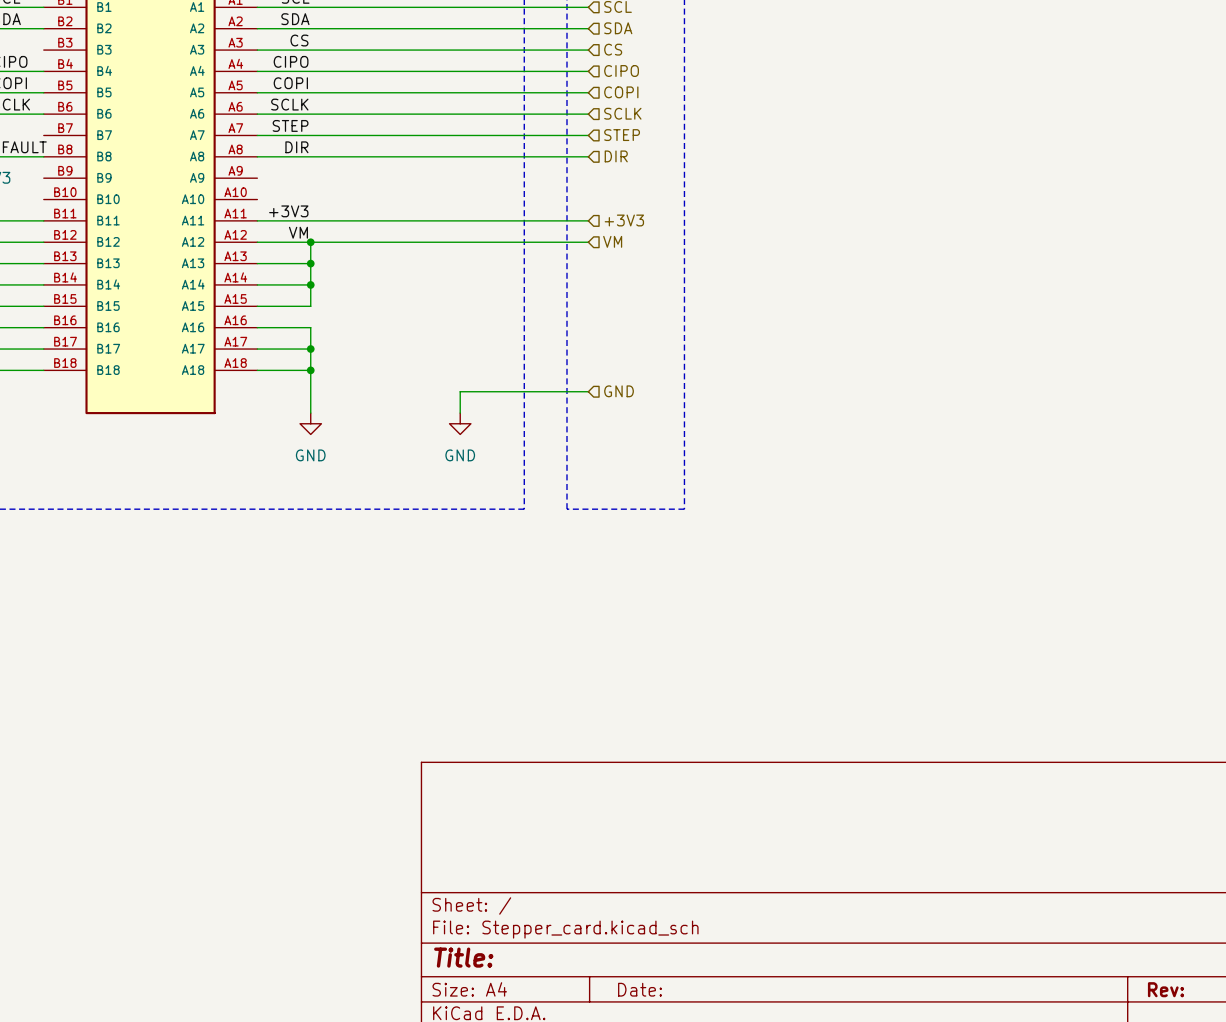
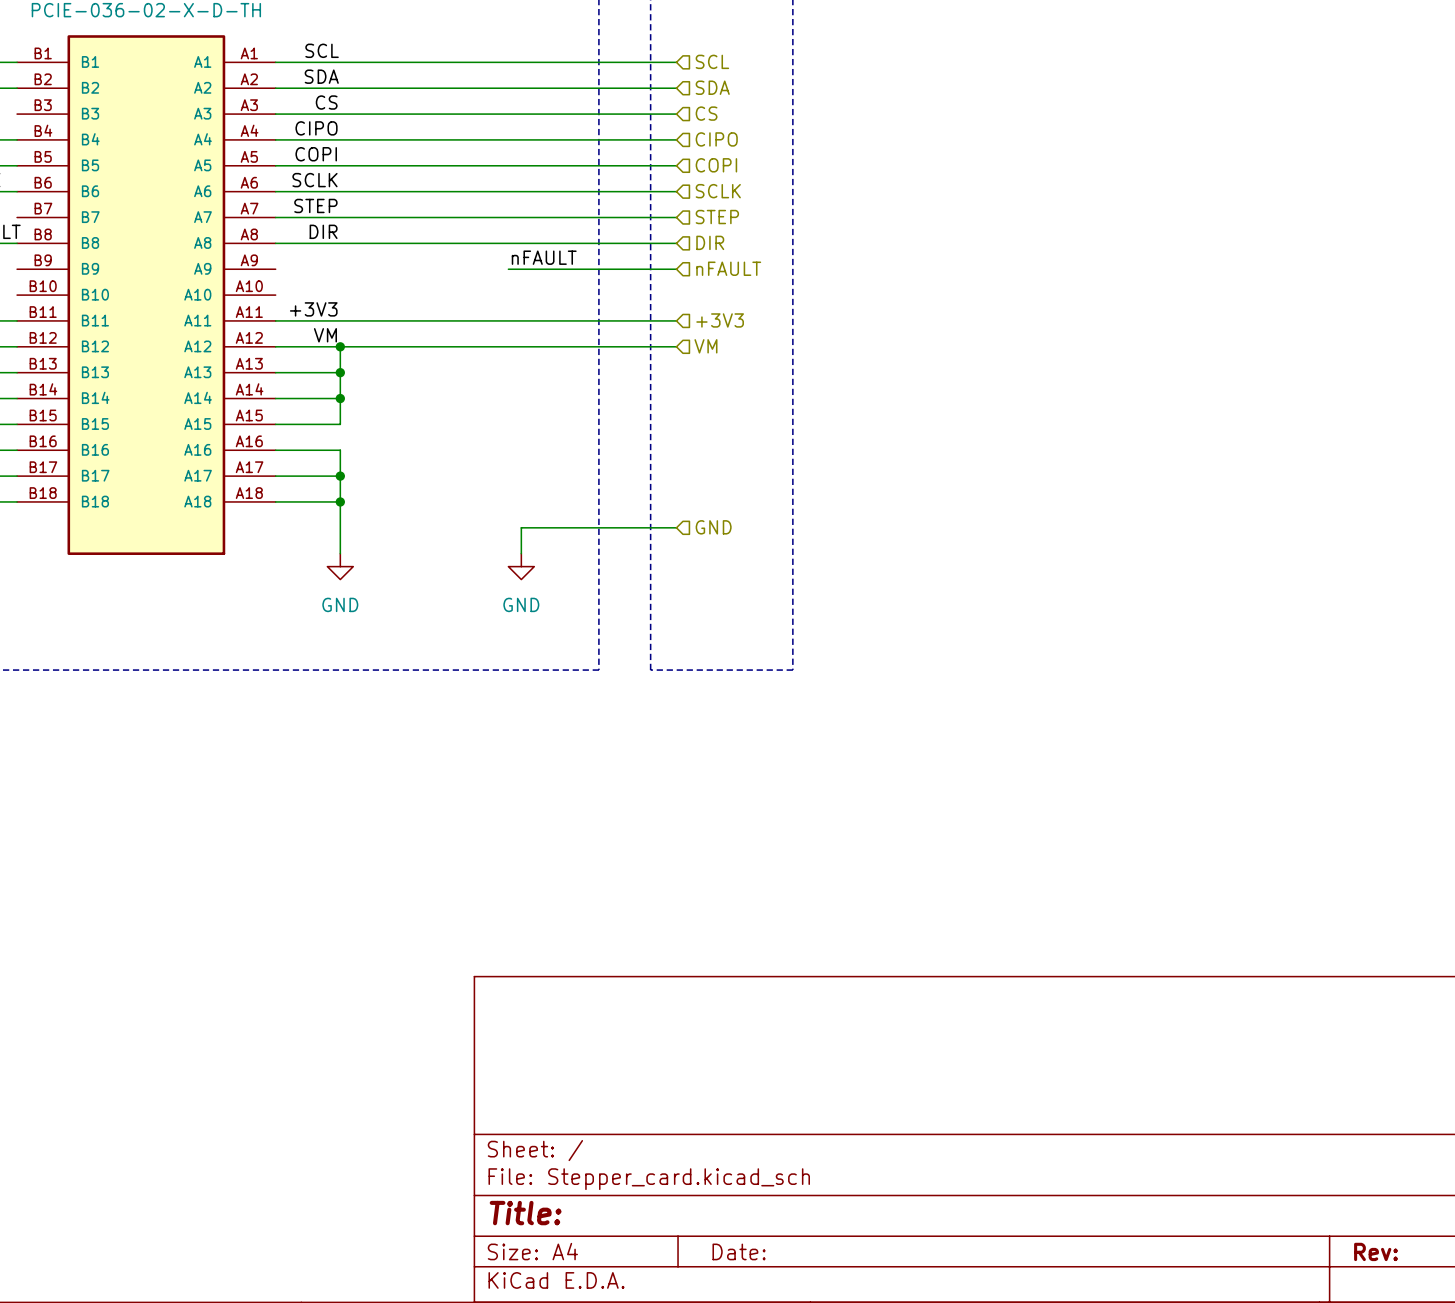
label: none -> nFAULT (544, 257)
hierarchical label: none -> nFAULT (728, 268)
wire: none -> (508, 269) (676, 269)

